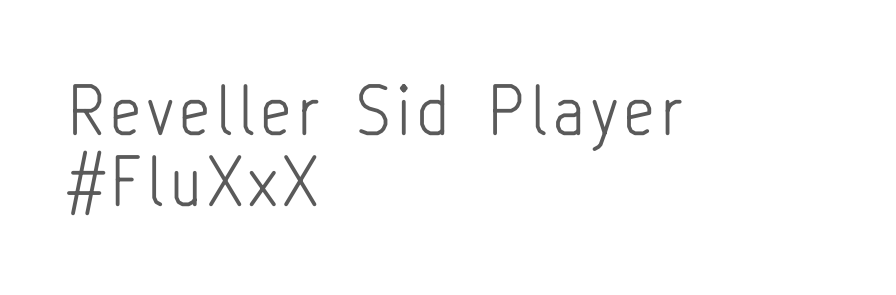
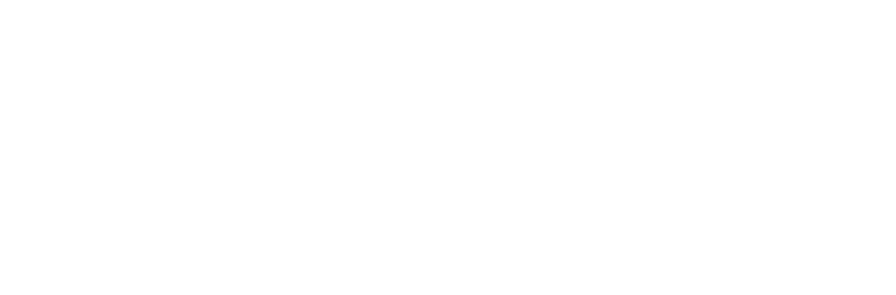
text: Reveller Sid Player (377, 117) -> none
text: #FluXxX (191, 182) -> none

